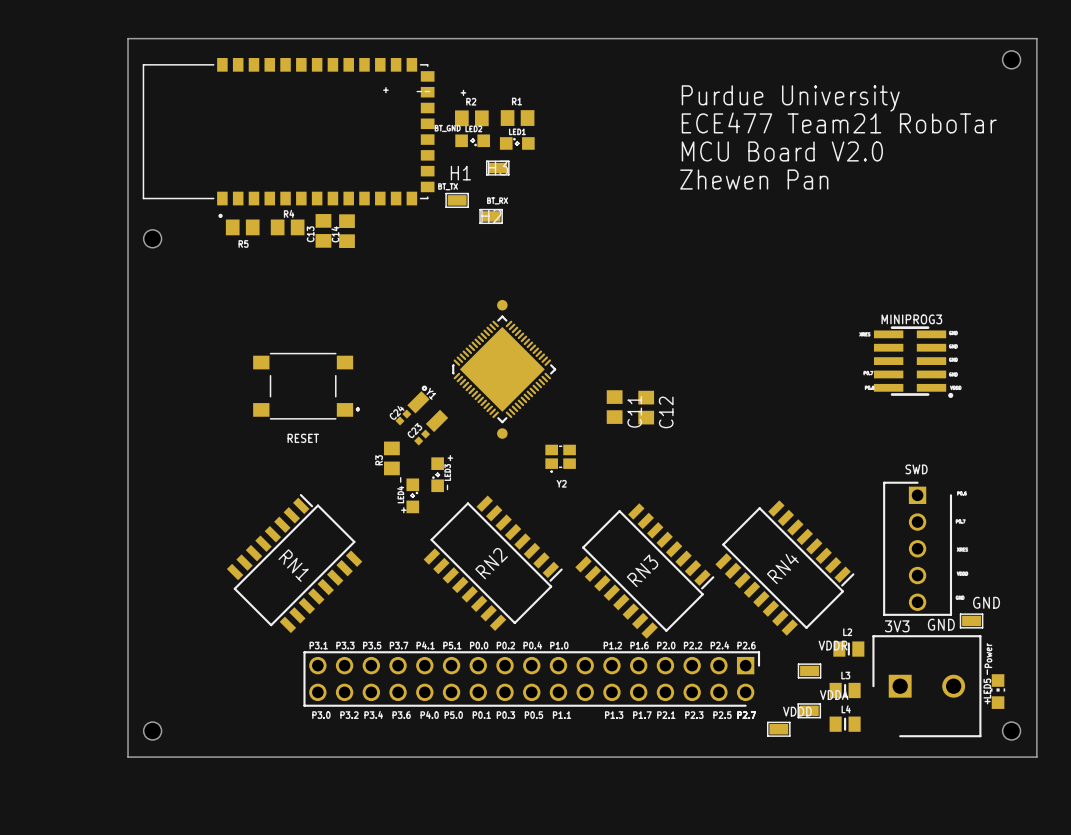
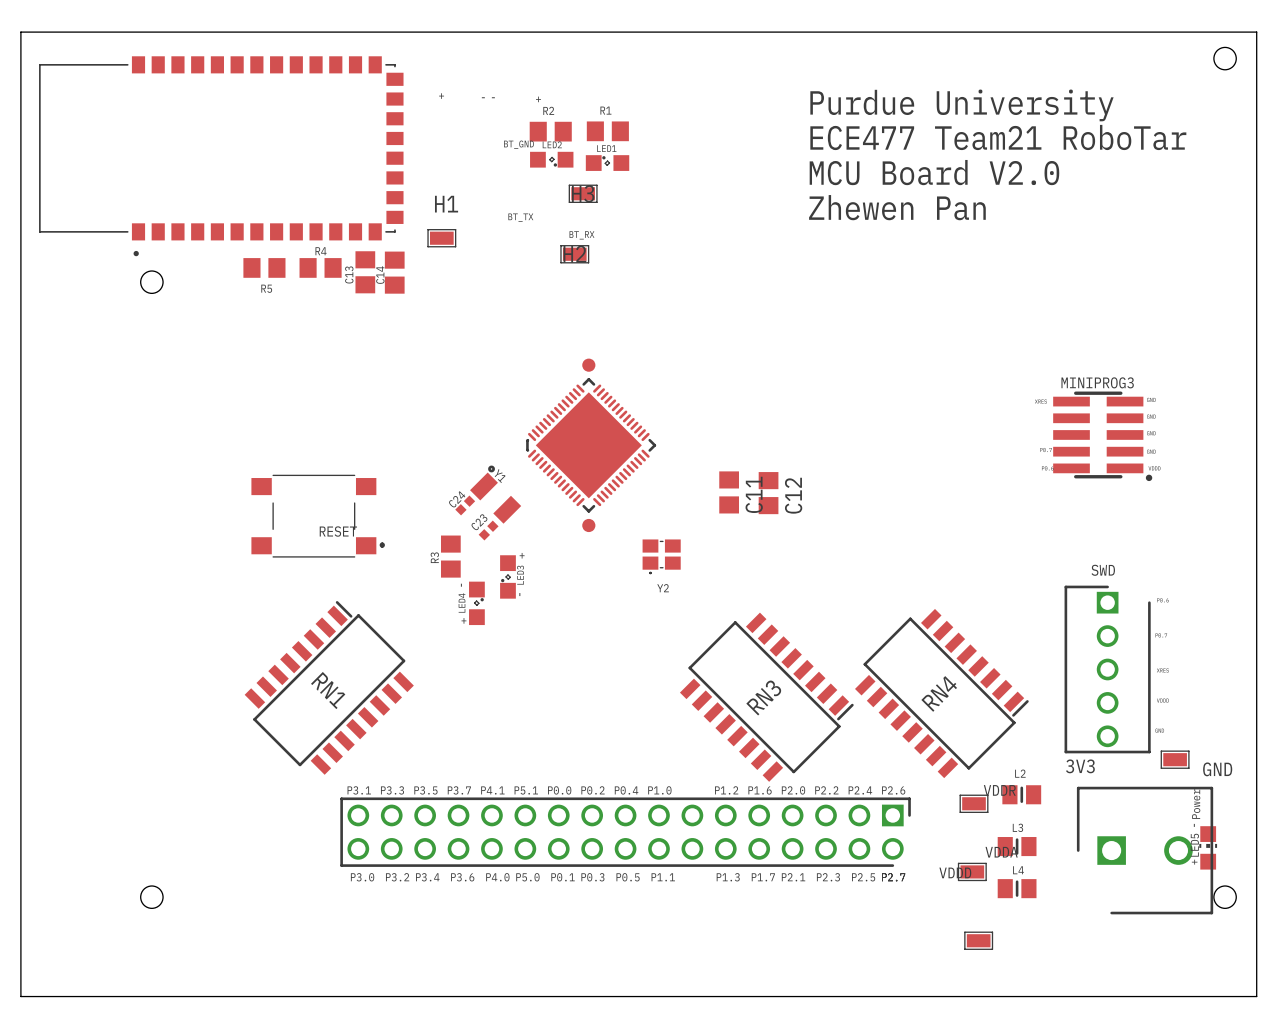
board edge: (128, 38) (128, 757) (1036, 757) -> (121, 32) (20, 32) (20, 996) (1256, 996) (1256, 929)
part position: (288, 138) -> (221, 156)
H1 position: (457, 200) -> (441, 238)
part position: (306, 386) -> (318, 516)
RN2: (493, 563) -> none
text: GND (986, 602) -> none
text: GND (941, 624) -> none
text: none -> GND (1217, 769)
part position: (809, 670) -> (974, 803)
part position: (926, 686) -> (1145, 850)
part: (778, 729) -> none
part: none -> (978, 940)

